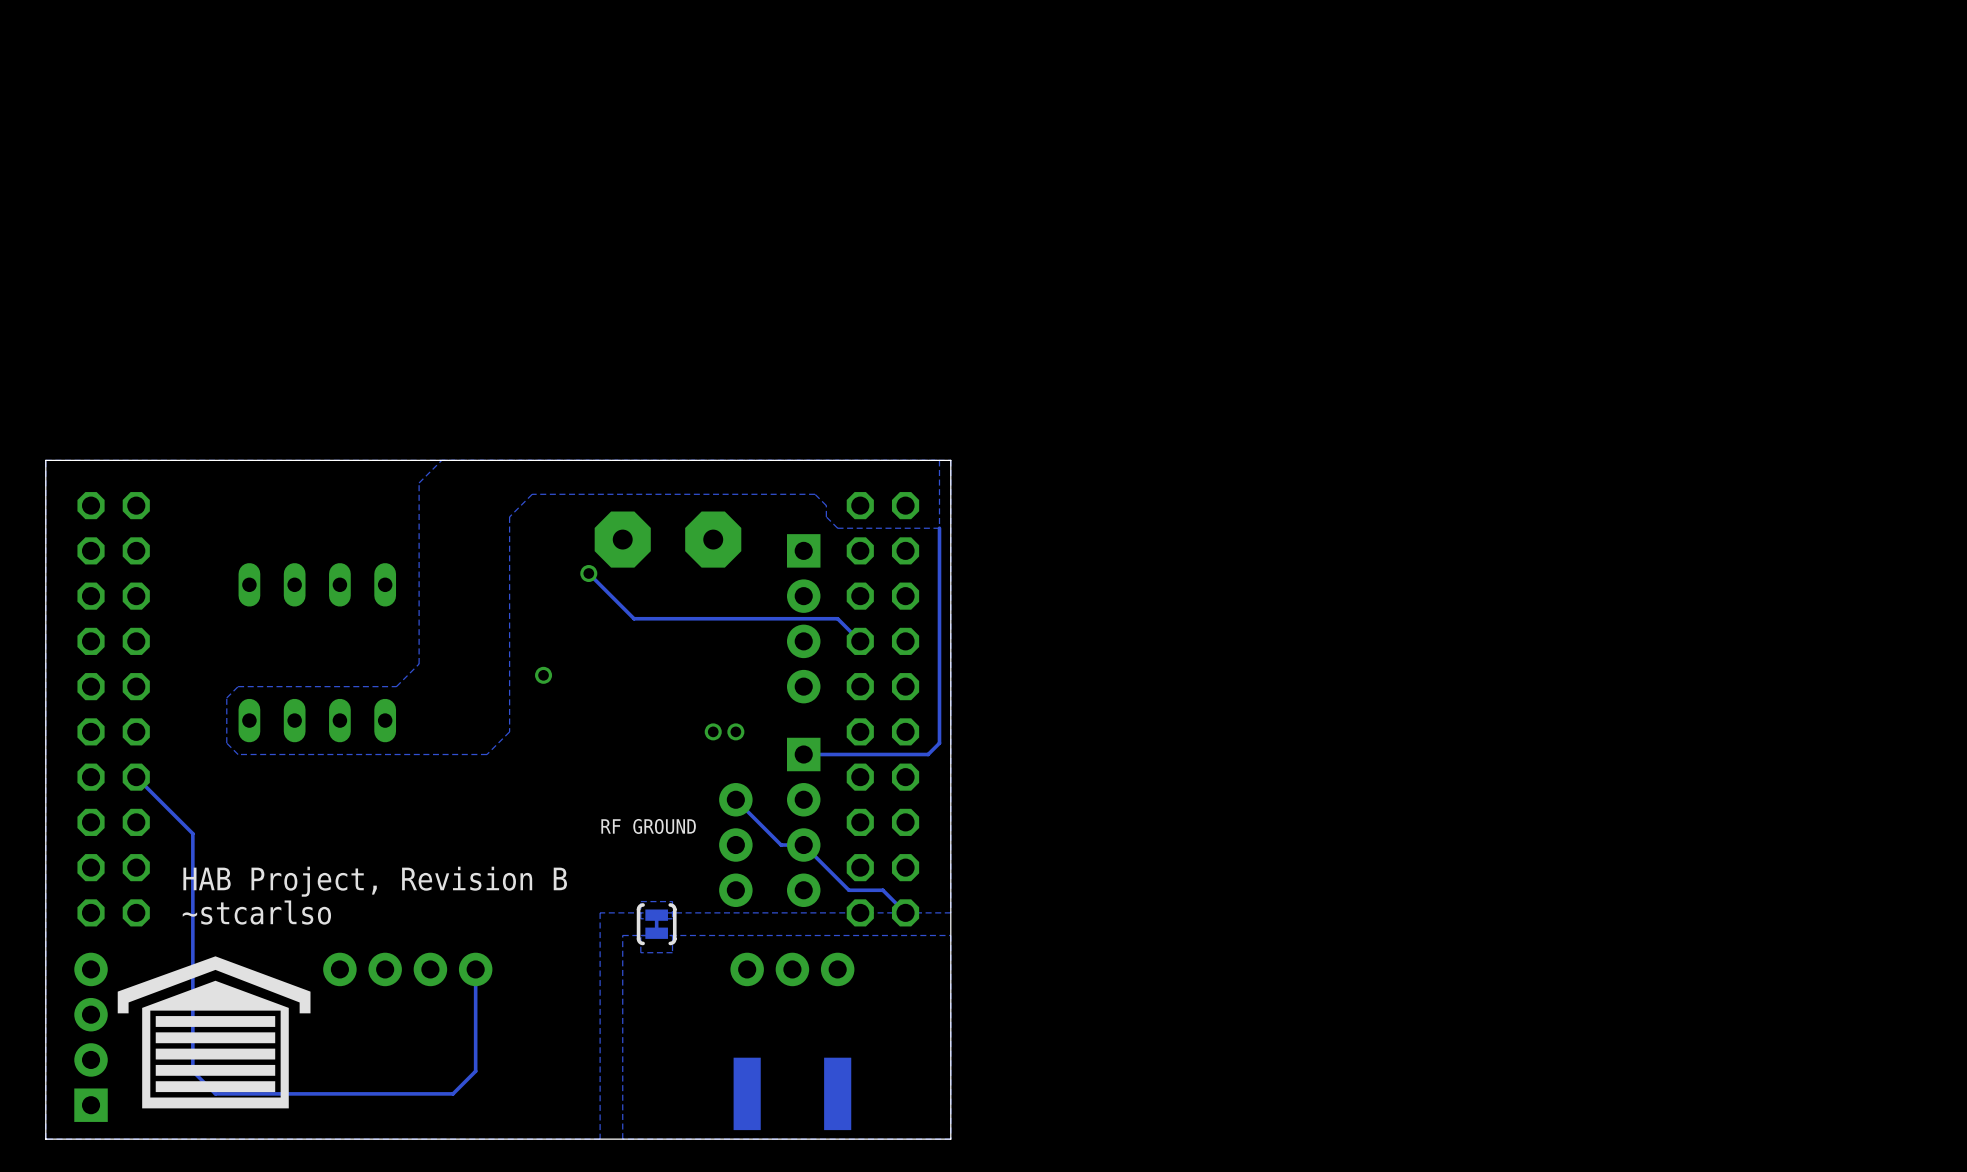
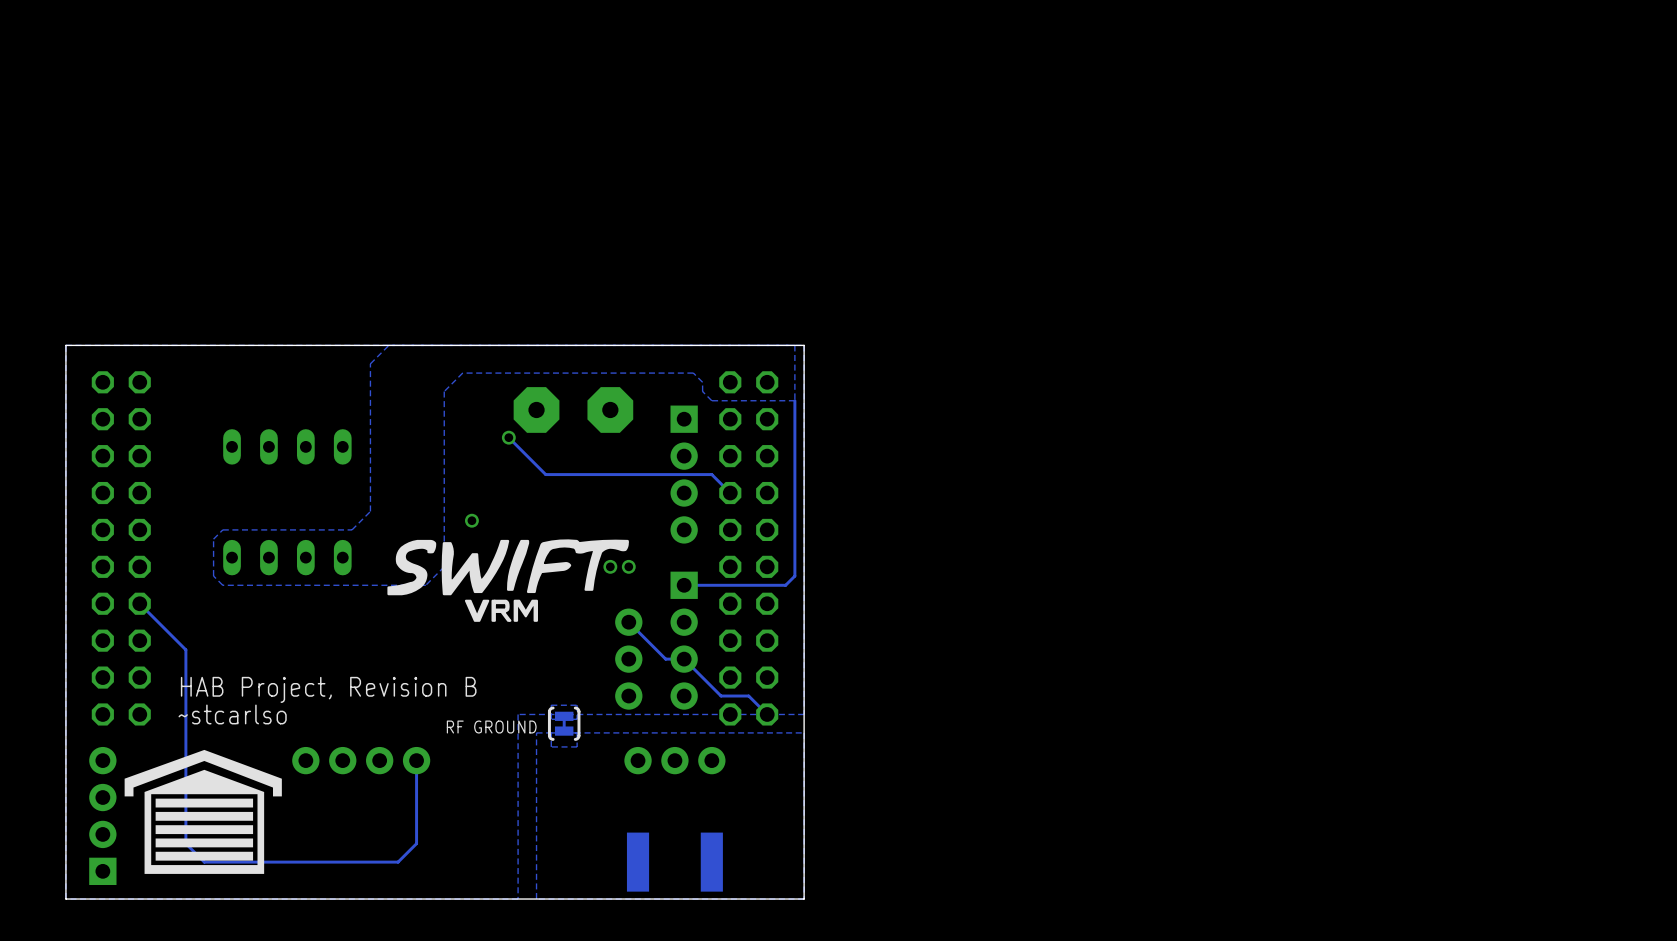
drawing: none -> [387, 539, 629, 622]
text position: RF GROUND (648, 826) -> RF GROUND (491, 727)

